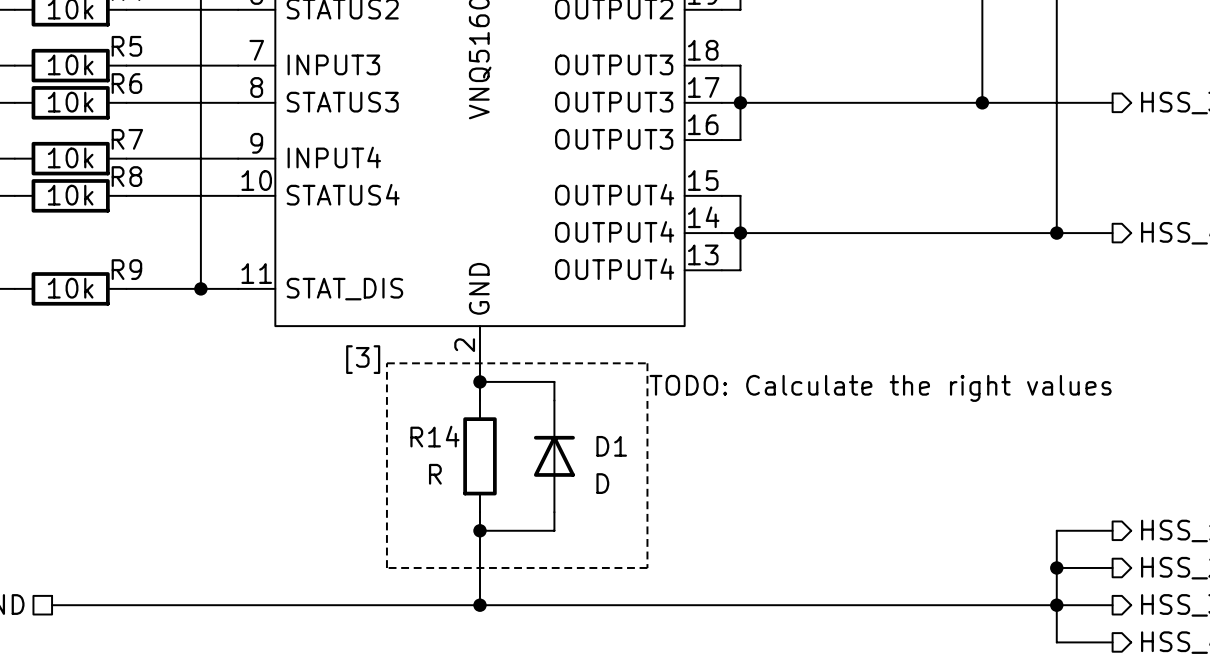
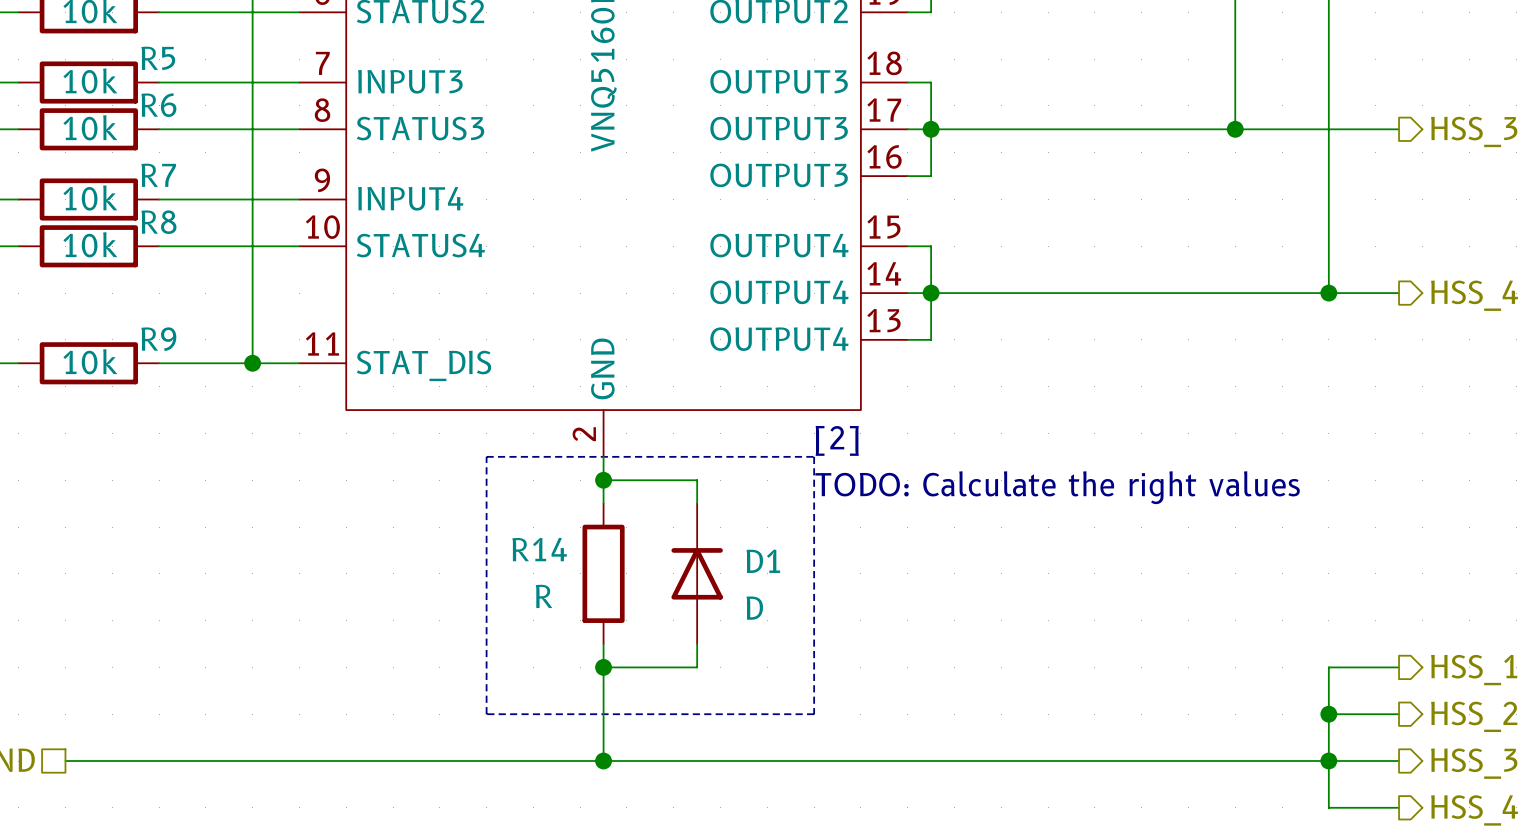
text: none -> [2] (837, 440)
text: [3] (363, 359) -> none

